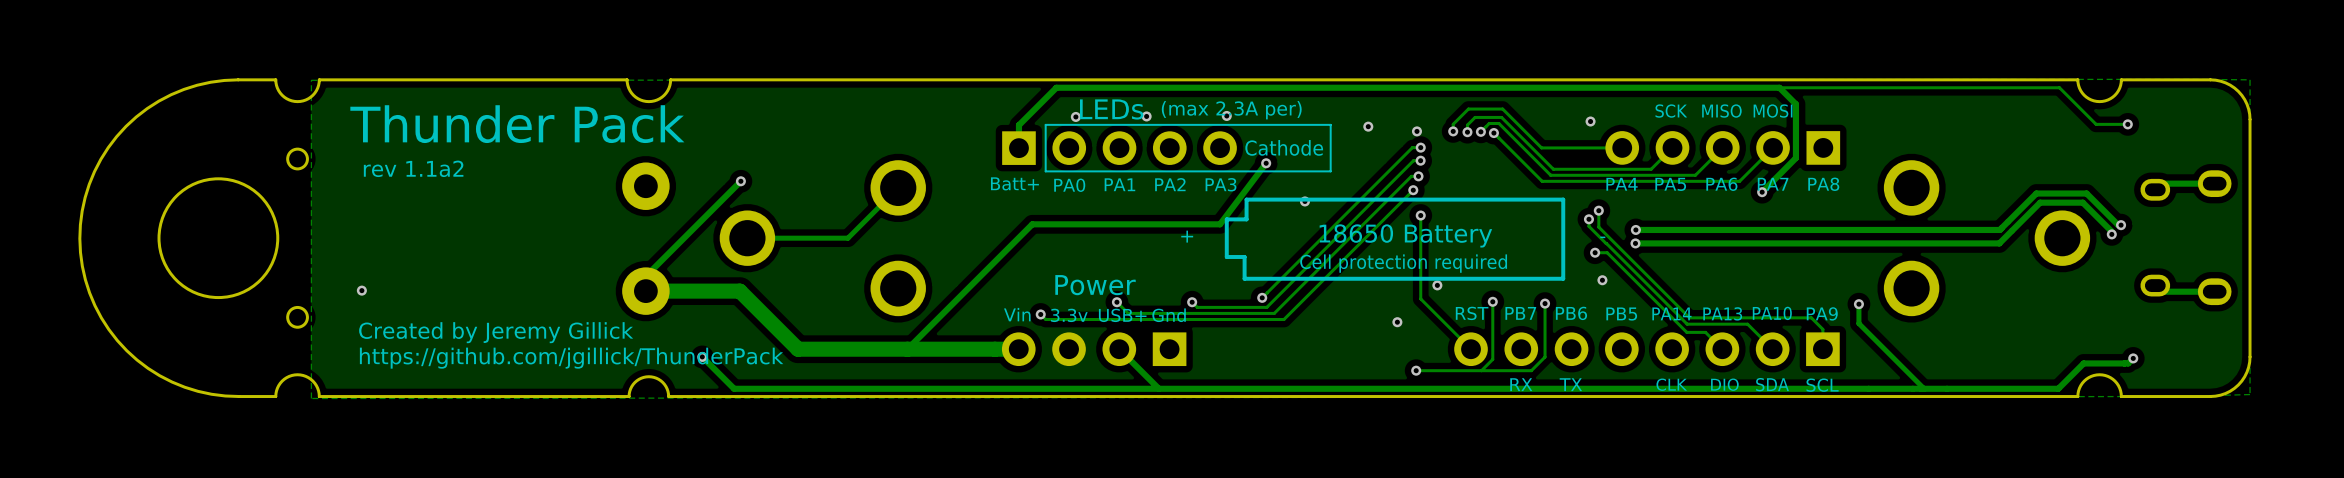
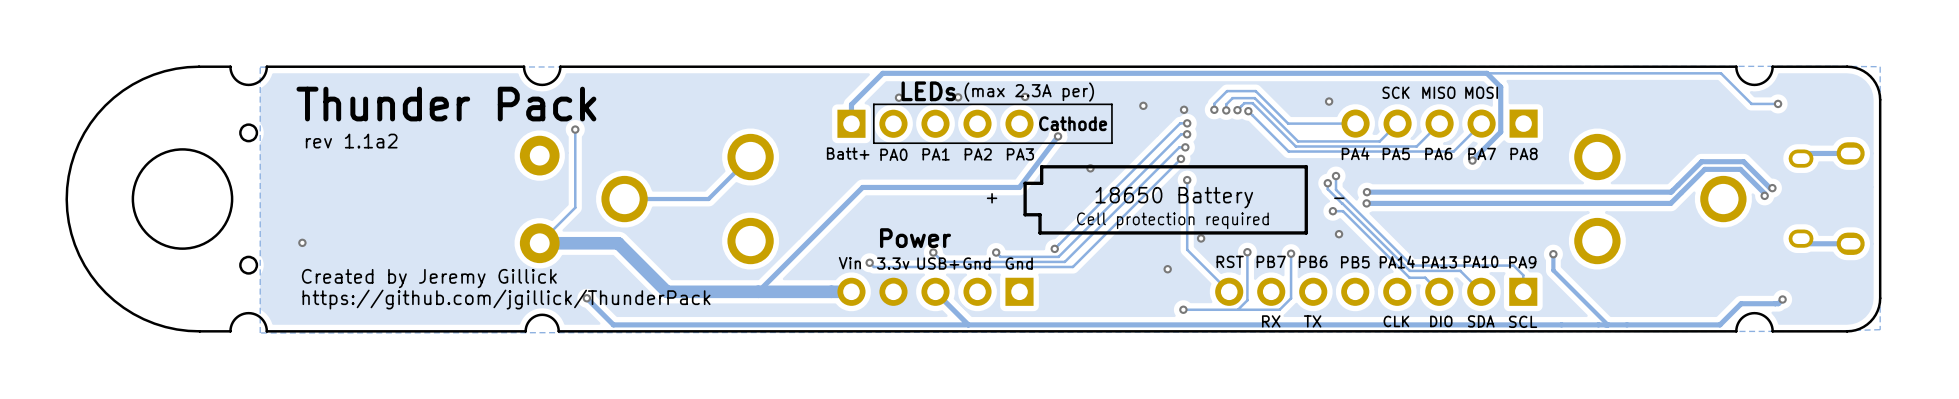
track: (740, 181) (645, 276) (645, 291) -> (575, 129) (575, 207) (539, 243)
via position: (740, 181) -> (575, 129)
text: none -> Gnd (1019, 263)
part: (1094, 349) -> none
part: none -> (935, 291)

